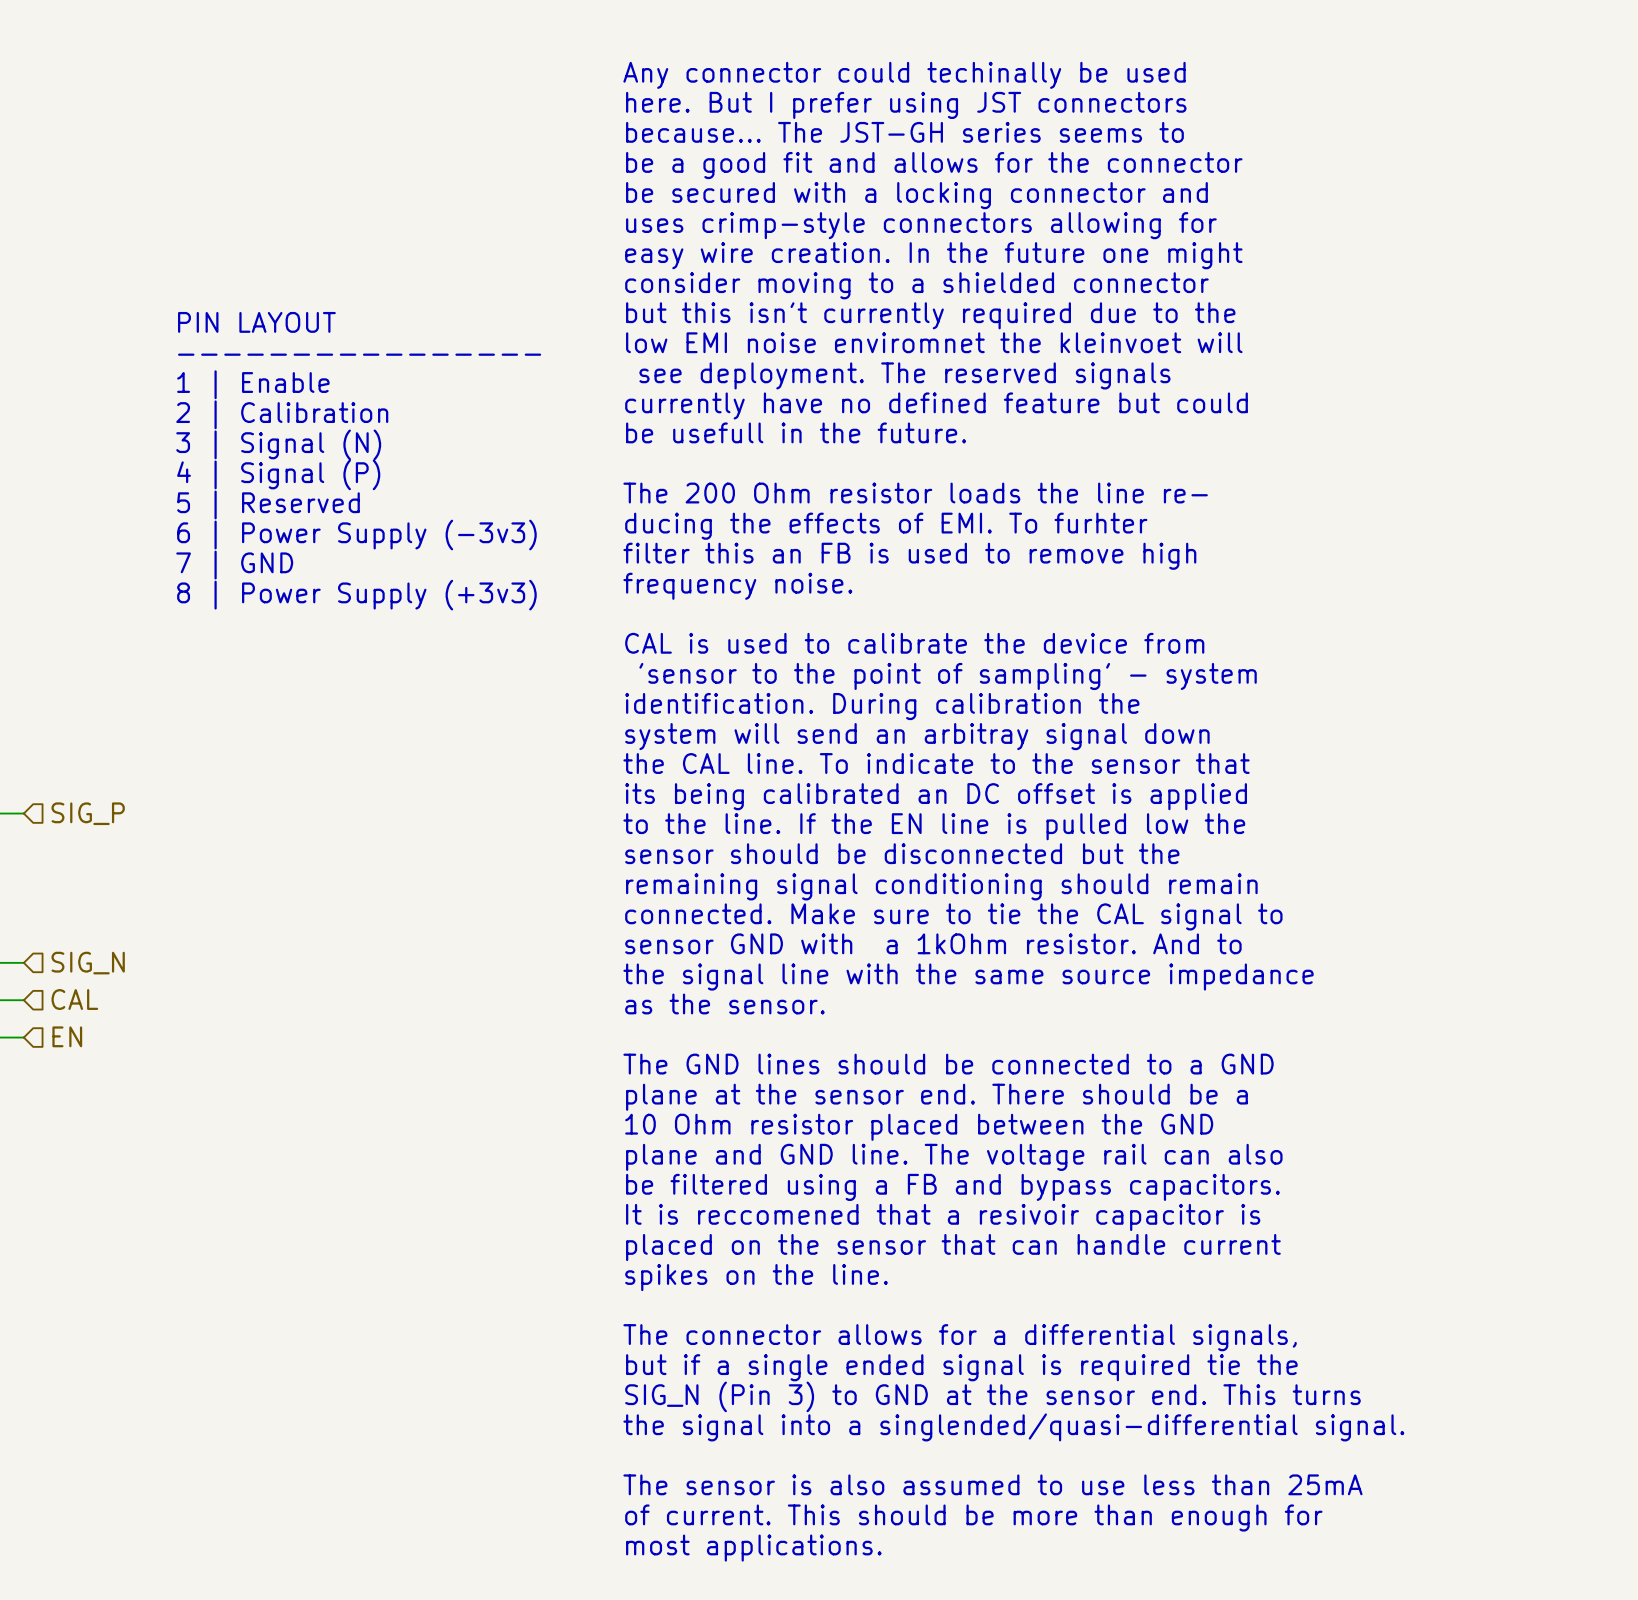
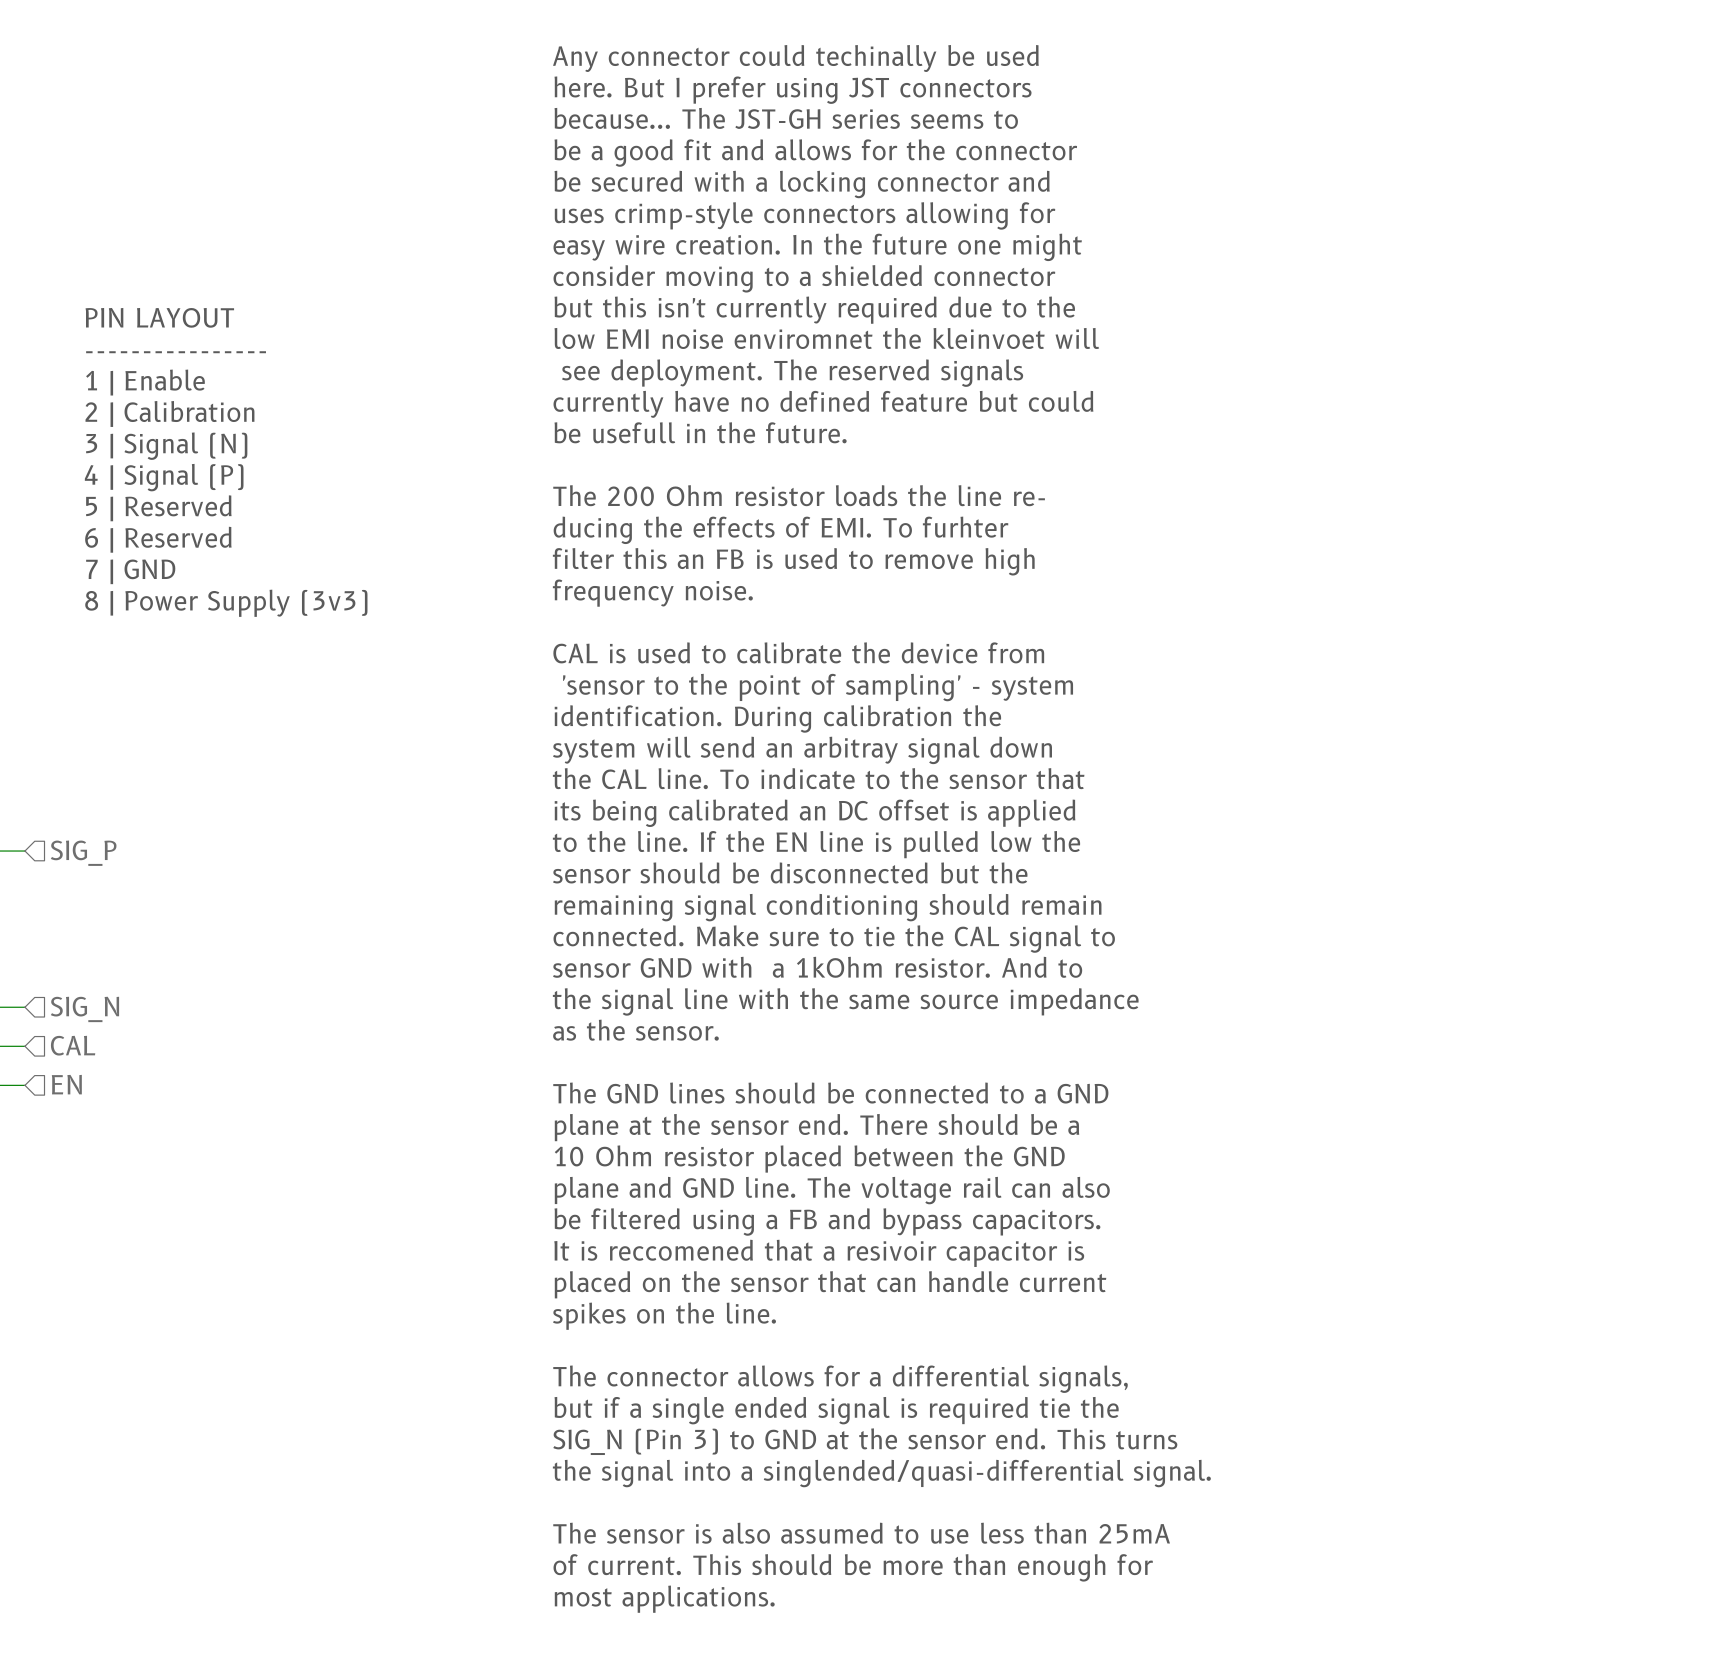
text position: Any connector could techinally be used (904, 75) -> Any connector could techinally be used (795, 58)
text position: here. But I prefer using JST connectors (906, 105) -> here. But I prefer using JST connectors (793, 90)
text position: because... The JST-GH series seems to (904, 132) -> because... The JST-GH series seems to (786, 118)
text position: be a good fit and allows for the connector (934, 165) -> be a good fit and allows for the connector (815, 153)
text position: be secured with a locking connector and (916, 195) -> be secured with a locking connector and (802, 184)
text position: uses crimp-style connectors allowing for (921, 225) -> uses crimp-style connectors allowing for (805, 215)
text position: easy wire creation. In the future one might (933, 255) -> easy wire creation. In the future one might (817, 247)
text position: consider moving to a shielded connector (916, 285) -> consider moving to a shielded connector (804, 278)
text position: but this isn't currently required due to the (930, 315) -> but this isn't currently required due to the (814, 310)
text position: PIN LAYOUT (256, 322) -> PIN LAYOUT (159, 317)
text position: low EMI noise enviromnet the kleinvoet will (934, 342) -> low EMI noise enviromnet the kleinvoet will (826, 338)
text position: ---------------- (359, 354) -> ---------------- (176, 352)
text position: see deployment. The reserved signals (904, 375) -> see deployment. The reserved signals (792, 373)
text position: 1 | Enable (253, 384) -> 1 | Enable (145, 382)
text position: currently have no defined feature but could (936, 405) -> currently have no defined feature but could (823, 404)
text position: 2 | Calibration (282, 414) -> 2 | Calibration (169, 413)
text position: be usefull in the future. (796, 432) -> be usefull in the future. (700, 432)
text position: 3 | Signal (N) (278, 444) -> 3 | Signal (N) (166, 446)
text position: 4 | Signal (P) (278, 474) -> 4 | Signal (P) (164, 477)
text position: The 200 Ohm resistor loads the line re- (915, 493) -> The 200 Ohm resistor loads the line re- (799, 495)
text position: 5 | Reserved (268, 504) -> 5 | Reserved (158, 508)
text: none -> 6 | Reserved (158, 539)
text position: ducing the effects of EMI. To furhter (886, 526) -> ducing the effects of EMI. To furhter (780, 530)
text: 6 | Power Supply (-3v3) (356, 535) -> none
text position: filter this an FB is used to remove high (909, 556) -> filter this an FB is used to remove high (793, 561)
text position: 7 | GND (234, 565) -> 7 | GND (130, 571)
text position: frequency noise. (737, 586) -> frequency noise. (652, 593)
text: 8 | Power Supply (+3v3) (356, 595) -> 8 | Power Supply (3v3) (226, 603)
text position: CAL is used to calibrate the device from (914, 643) -> CAL is used to calibrate the device from (798, 652)
text position: 'sensor to the point of sampling' - system (948, 676) -> 'sensor to the point of sampling' - system (818, 687)
text position: identification. During calibration the (882, 706) -> identification. During calibration the (777, 718)
text position: system will send an arbitray signal down (917, 736) -> system will send an arbitray signal down (802, 750)
text position: the CAL line. To indicate to the sensor that (936, 763) -> the CAL line. To indicate to the sensor that (818, 778)
text position: its being calibrated an DC offset is applied (936, 796) -> its being calibrated an DC offset is applied (815, 813)
text position: to the line. If the EN line is pulled low the (934, 826) -> to the line. If the EN line is pulled low the (816, 844)
text position: sensor should be disconnected but the (902, 853) -> sensor should be disconnected but the (790, 872)
text position: remaining signal conditioning should remain (941, 886) -> remaining signal conditioning should remain (828, 907)
text position: connected. Make sure to tie the CAL signal to (953, 916) -> connected. Make sure to tie the CAL signal to (834, 939)
text position: sensor GND with a 1kOhm resistor. And to (933, 943) -> sensor GND with a 1kOhm resistor. And to (817, 967)
text position: the signal line with the same source impedance (968, 977) -> the signal line with the same source impedance (845, 1001)
text position: as the sensor. (724, 1003) -> as the sensor. (635, 1030)
text position: The GND lines should be connected to a GND (948, 1064) -> The GND lines should be connected to a GND (830, 1093)
text position: plane at the sensor end. There should be a (936, 1097) -> plane at the sensor end. There should be a (817, 1127)
text position: 10 Ohm resistor placed between the GND (919, 1127) -> 10 Ohm resistor placed between the GND (809, 1159)
text position: plane and GND line. The voltage rail can also (954, 1157) -> plane and GND line. The voltage rail can also (832, 1190)
text position: be filtered using a FB and bypass capacitors. (952, 1187) -> be filtered using a FB and bypass capacitors. (827, 1222)
text position: It is reccomened that a resivoir capacitor is (943, 1217) -> It is reccomened that a resivoir capacitor is (819, 1253)
text position: placed on the sensor that can handle current (953, 1247) -> placed on the sensor that can handle current (830, 1284)
text position: spikes on the line. (756, 1277) -> spikes on the line. (664, 1316)
text position: The connector allows for a differential signals, (960, 1337) -> The connector allows for a differential signals, (840, 1379)
text position: but if a single ended signal is required tie the (961, 1367) -> but if a single ended signal is required tie the (836, 1410)
text position: SIG_N (Pin 3) to GND at the sensor end. This turns (992, 1396) -> SIG_N (Pin 3) to GND at the sensor end. This turns (865, 1441)
text position: the signal into a singlended/quasi-differential signal. (1013, 1427) -> the signal into a singlended/quasi-differential signal. (881, 1473)
text position: The sensor is also assumed to use less than 25mA (992, 1484) -> The sensor is also assumed to use less than 25mA (861, 1533)
text position: of current. This should be more than enough for (973, 1518) -> of current. This should be more than enough for (853, 1567)
text position: most applications. (753, 1548) -> most applications. (664, 1599)

